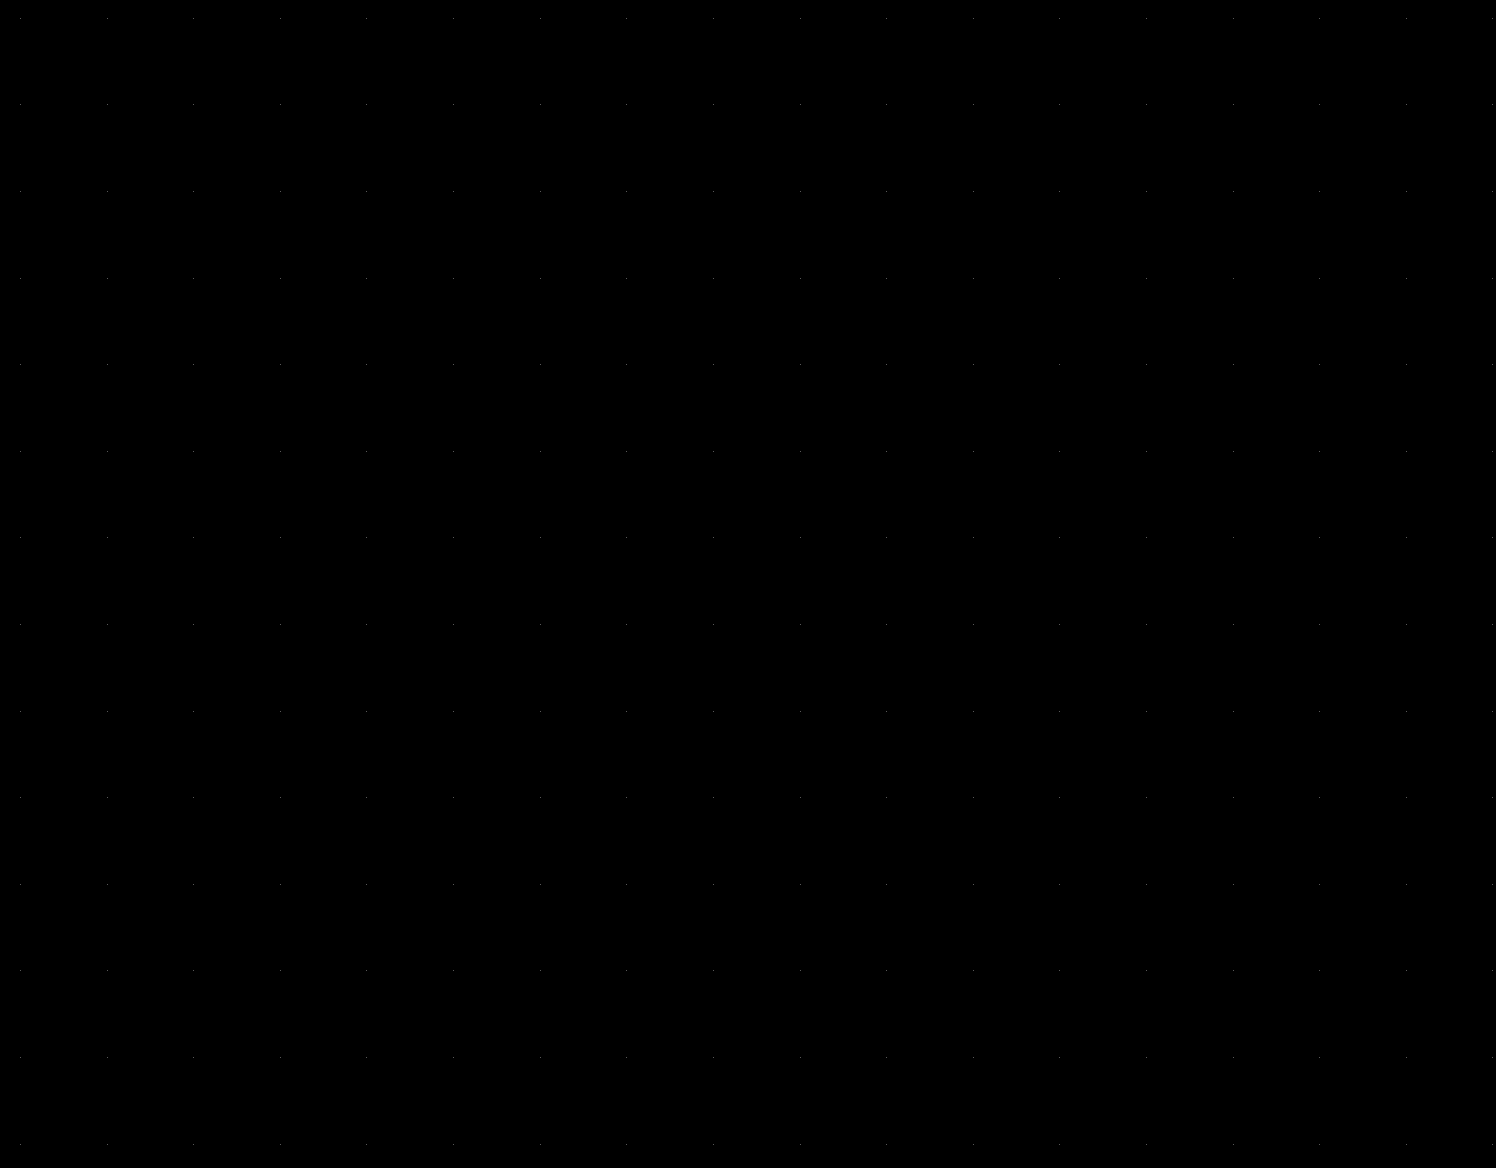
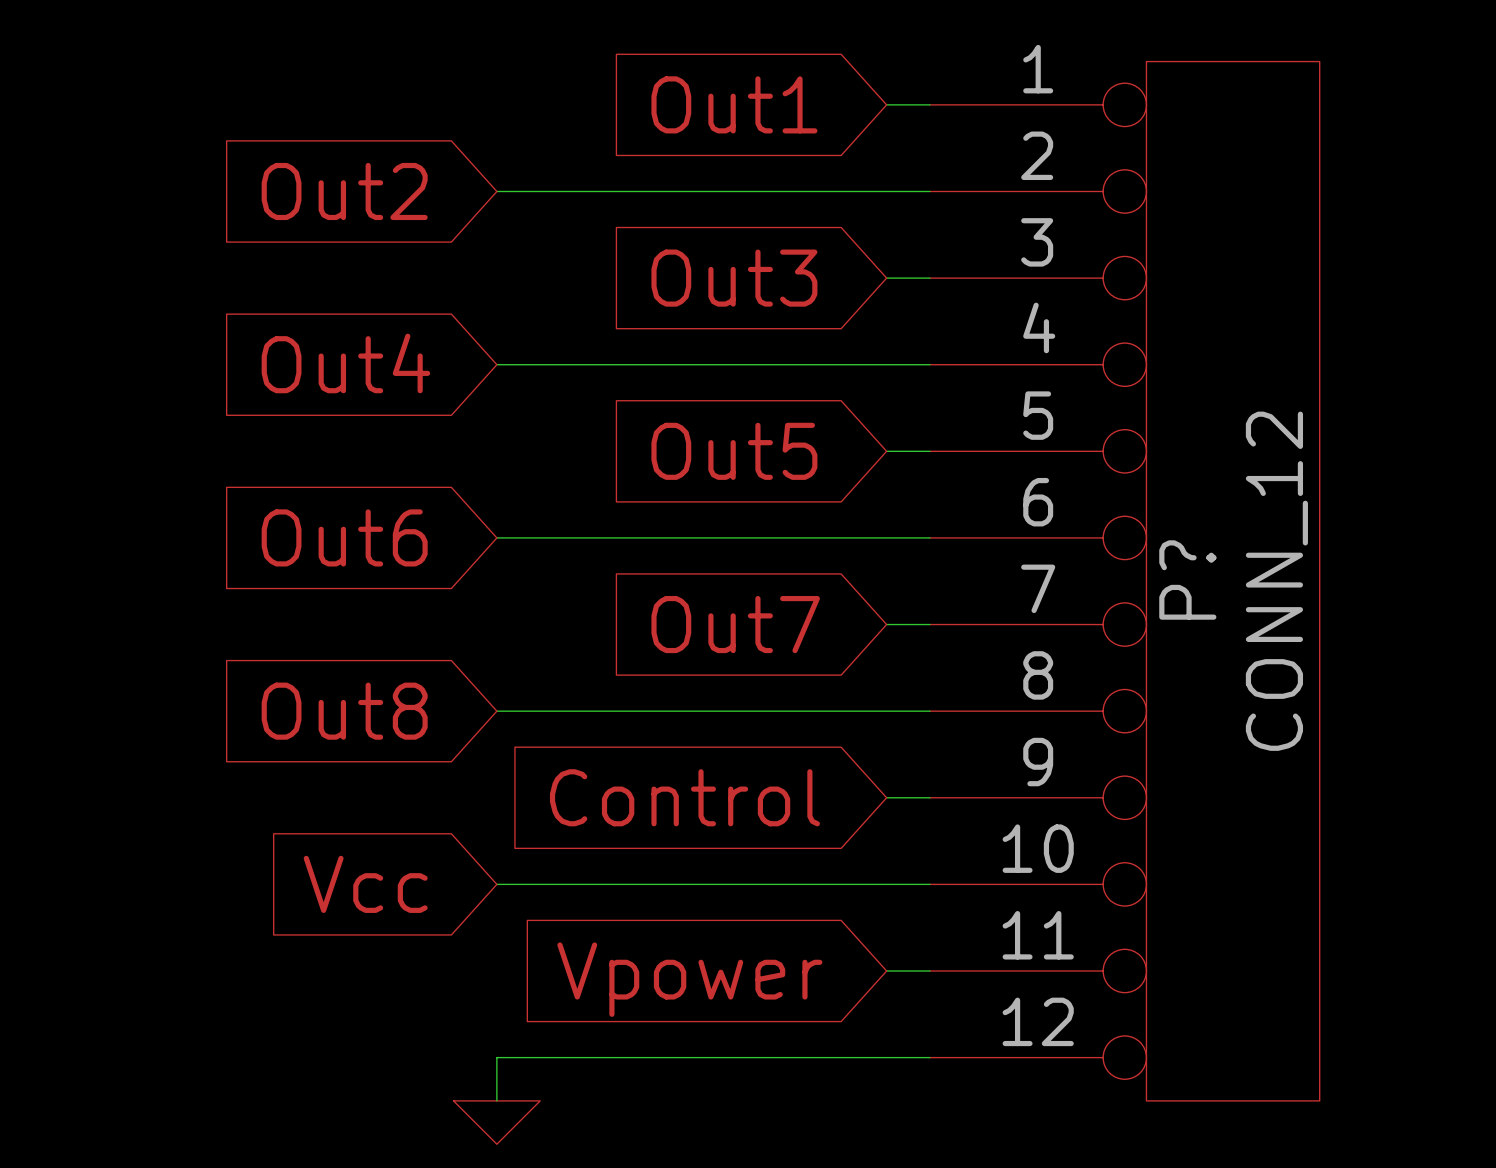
global label: none -> Out1 (734, 104)
wire: none -> (886, 104) (929, 104)
global label: none -> Out2 (344, 191)
wire: none -> (496, 191) (929, 191)
global label: none -> Out3 (734, 278)
wire: none -> (886, 278) (929, 278)
global label: none -> Out4 (345, 363)
wire: none -> (496, 364) (929, 364)
global label: none -> Out5 (734, 451)
wire: none -> (886, 451) (929, 451)
global label: none -> Out6 (344, 537)
wire: none -> (496, 537) (929, 537)
P?: none -> CONN_12 (1124, 581)
global label: none -> Out7 (735, 624)
wire: none -> (886, 624) (929, 624)
global label: none -> Out8 (344, 711)
wire: none -> (496, 711) (929, 711)
global label: none -> Control (684, 797)
wire: none -> (886, 797) (929, 797)
global label: none -> Vcc (365, 884)
wire: none -> (496, 884) (929, 884)
wire: none -> (886, 970) (929, 970)
global label: none -> Vpower (689, 979)
wire: none -> (929, 1057) (496, 1057) (496, 1100)
power symbol: none -> (496, 1122)

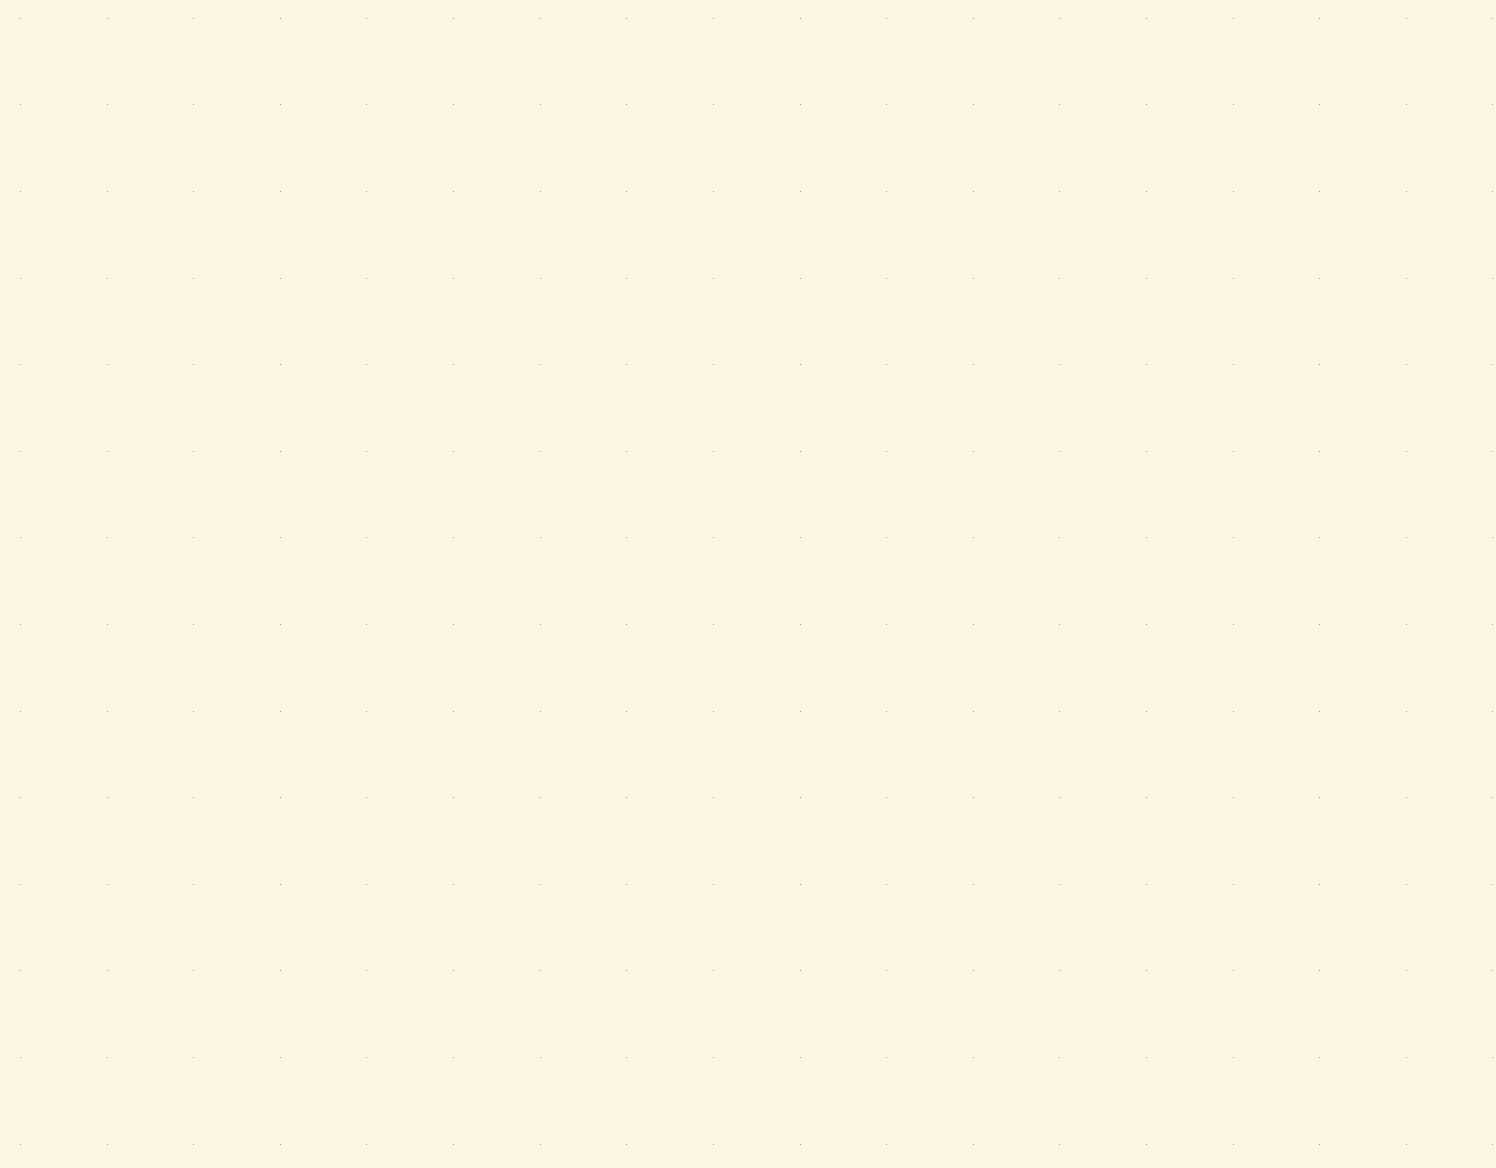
global label: Out1 (734, 104) -> none
wire: (886, 104) (929, 104) -> none
global label: Out2 (344, 191) -> none
wire: (496, 191) (929, 191) -> none
global label: Out3 (734, 278) -> none
wire: (886, 278) (929, 278) -> none
global label: Out4 (345, 363) -> none
wire: (496, 364) (929, 364) -> none
global label: Out5 (734, 451) -> none
wire: (886, 451) (929, 451) -> none
global label: Out6 (344, 537) -> none
wire: (496, 537) (929, 537) -> none
P?: CONN_12 (1124, 581) -> none
global label: Out7 (735, 624) -> none
wire: (886, 624) (929, 624) -> none
global label: Out8 (344, 711) -> none
wire: (496, 711) (929, 711) -> none
global label: Control (684, 797) -> none
wire: (886, 797) (929, 797) -> none
global label: Vcc (365, 884) -> none
wire: (496, 884) (929, 884) -> none
wire: (886, 970) (929, 970) -> none
global label: Vpower (689, 979) -> none
wire: (929, 1057) (496, 1057) (496, 1100) -> none
power symbol: (496, 1122) -> none

